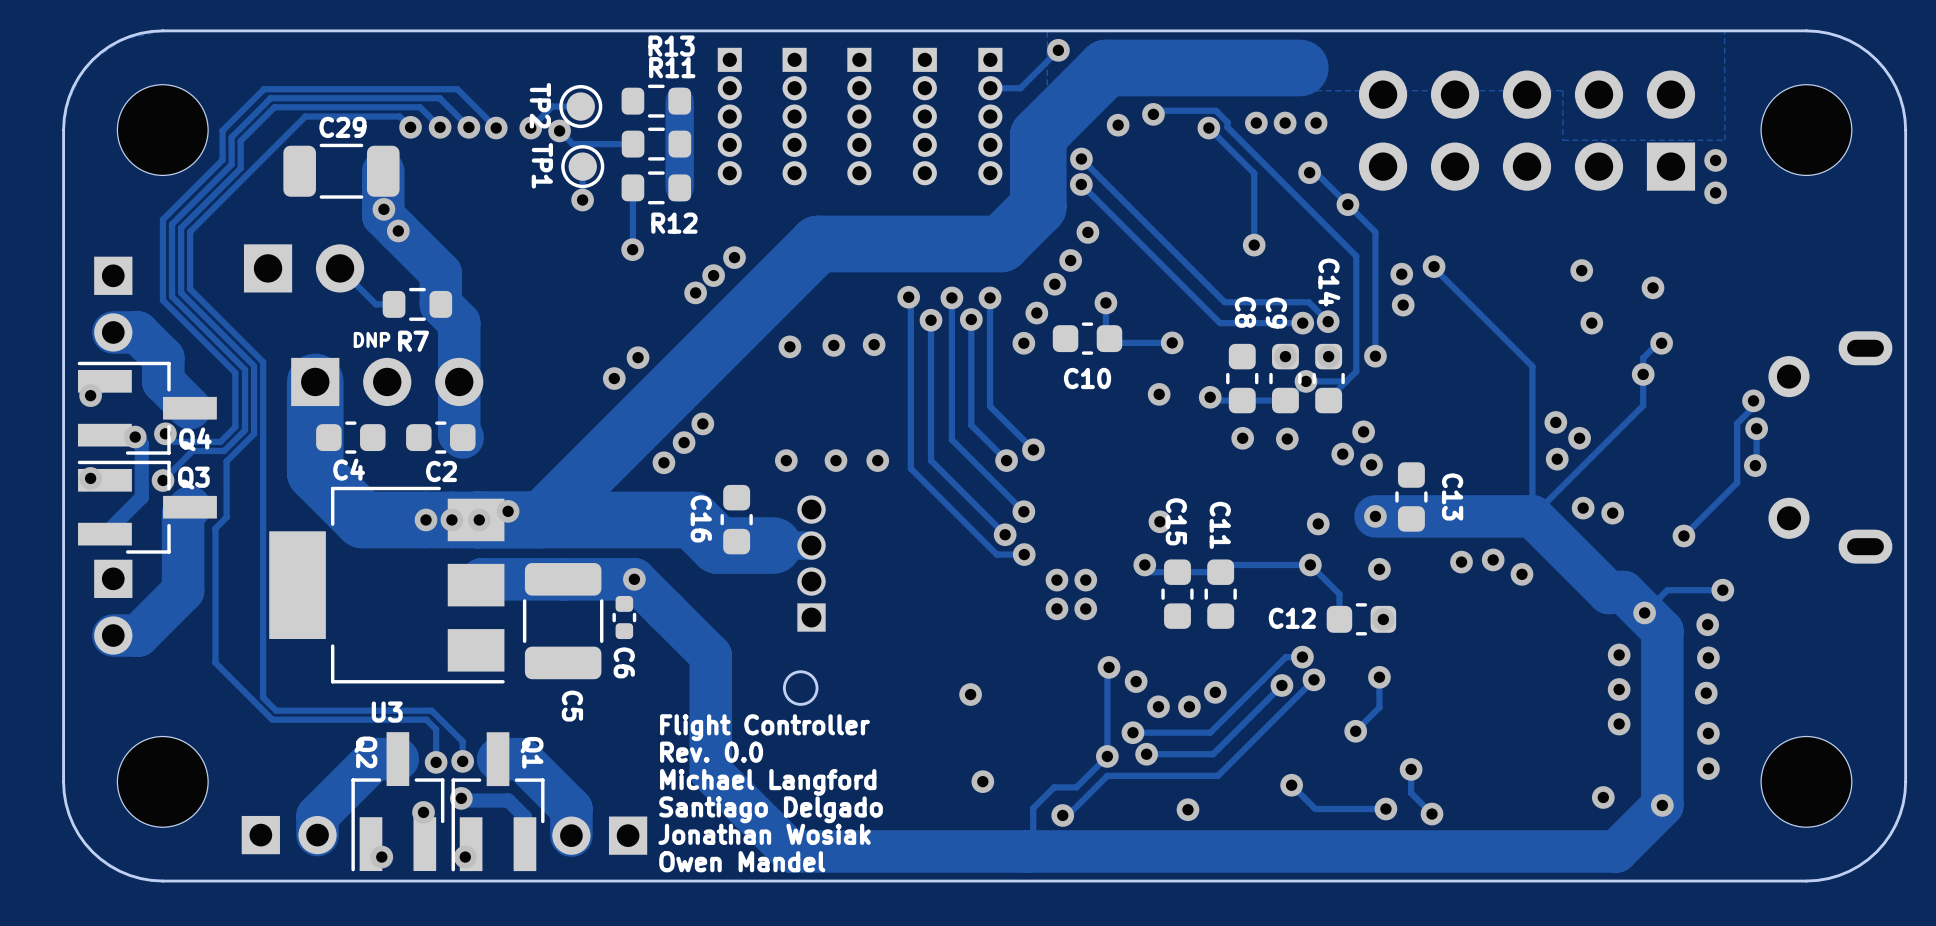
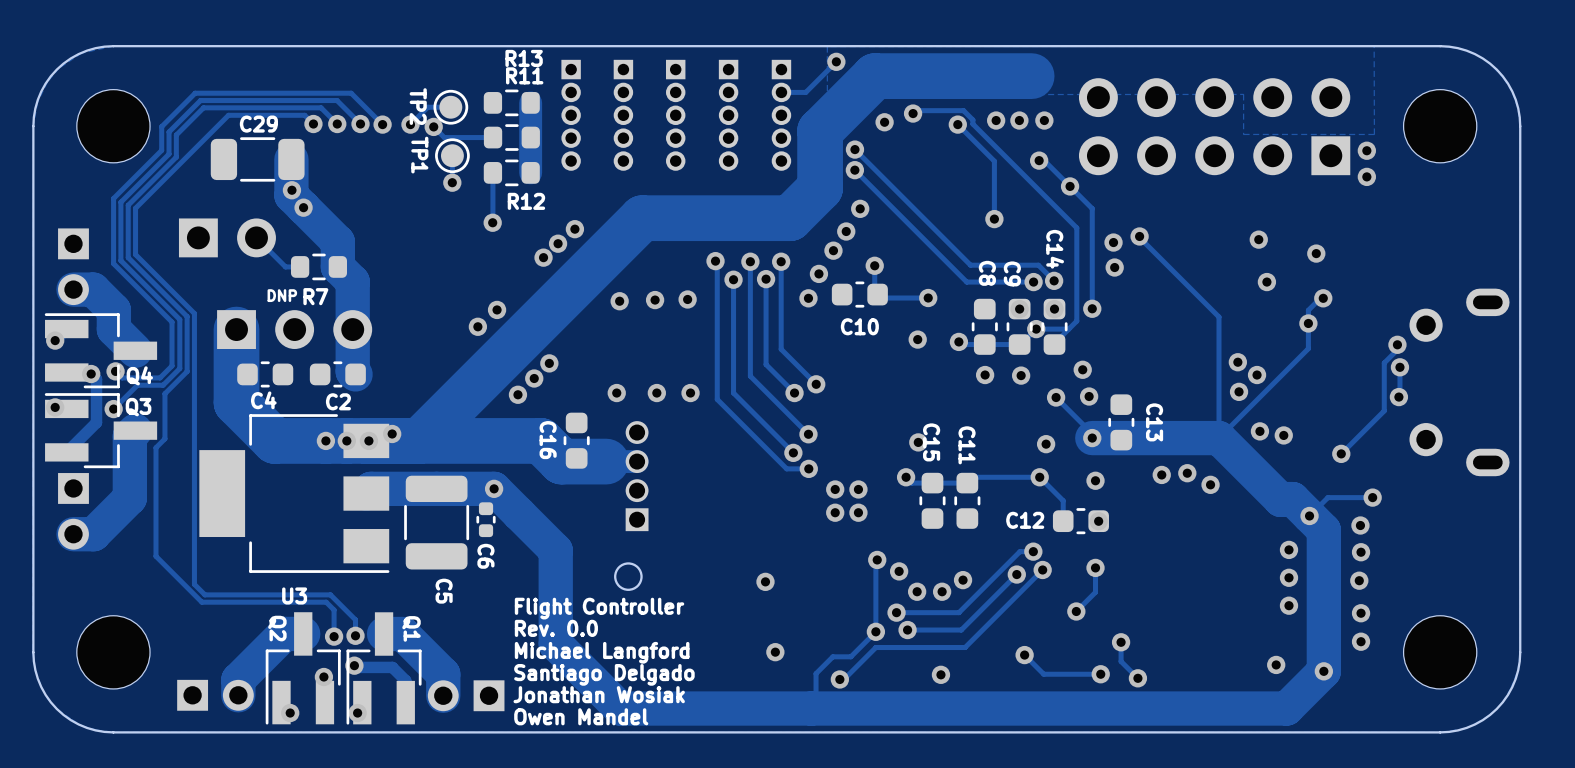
via position: (1342, 454) -> (1056, 397)
track: none -> (1056, 397) (1092, 433)

